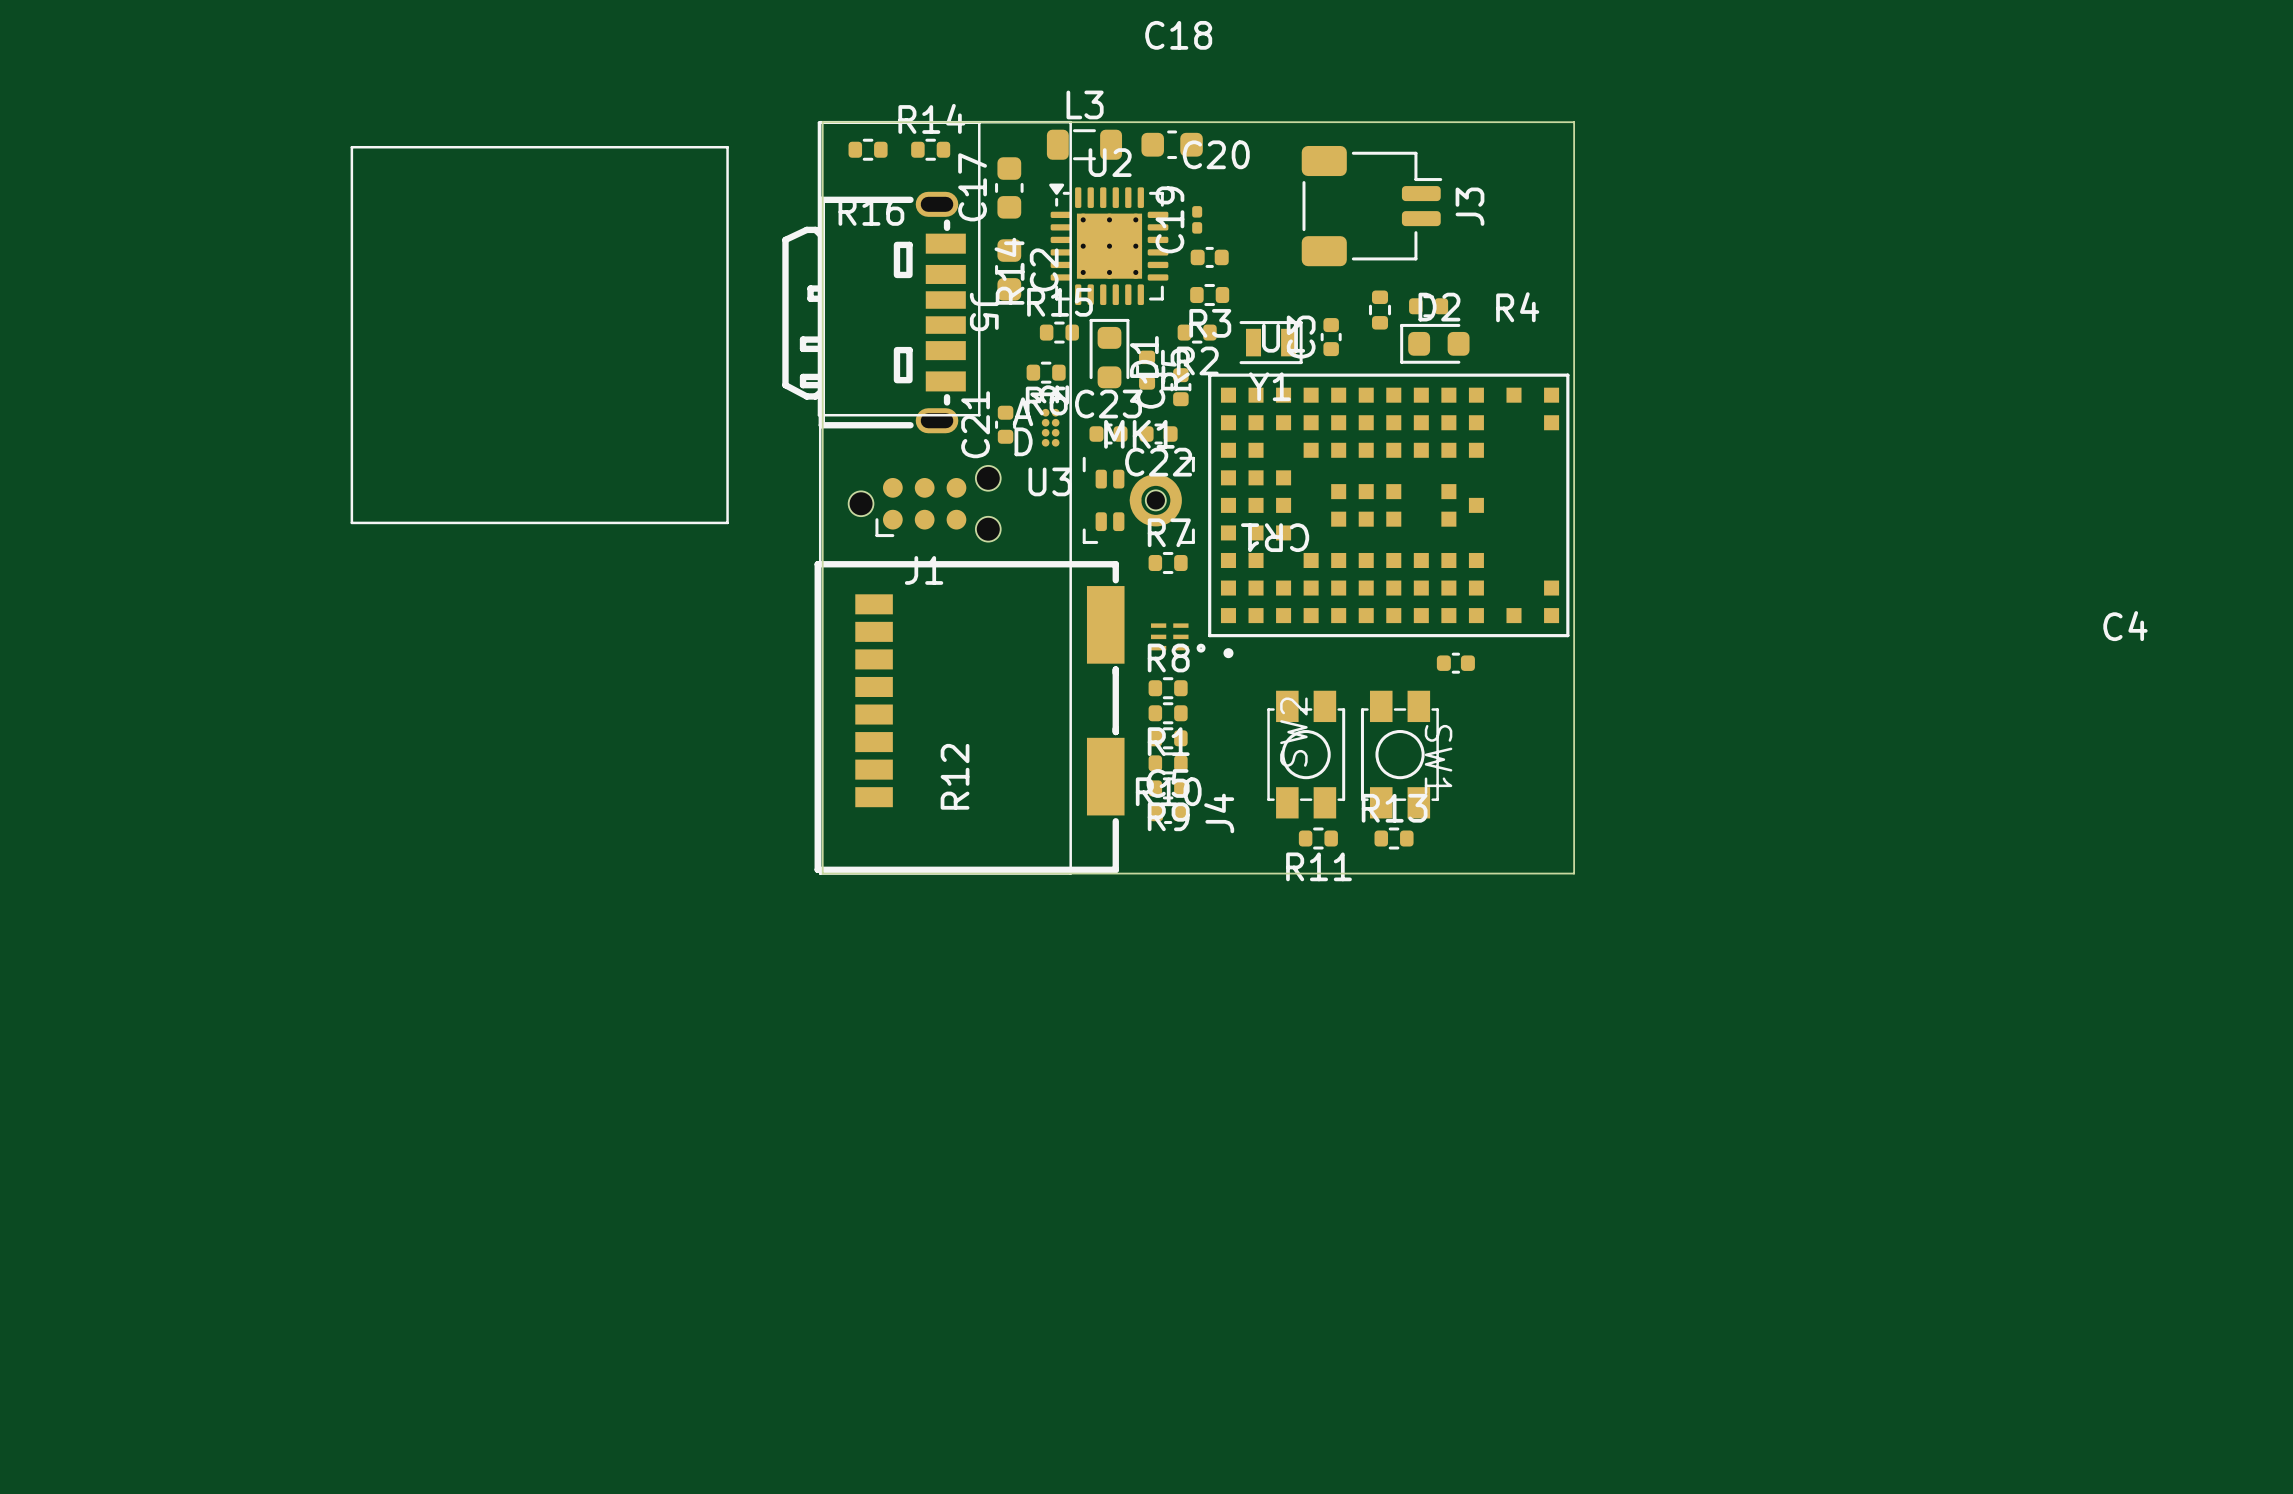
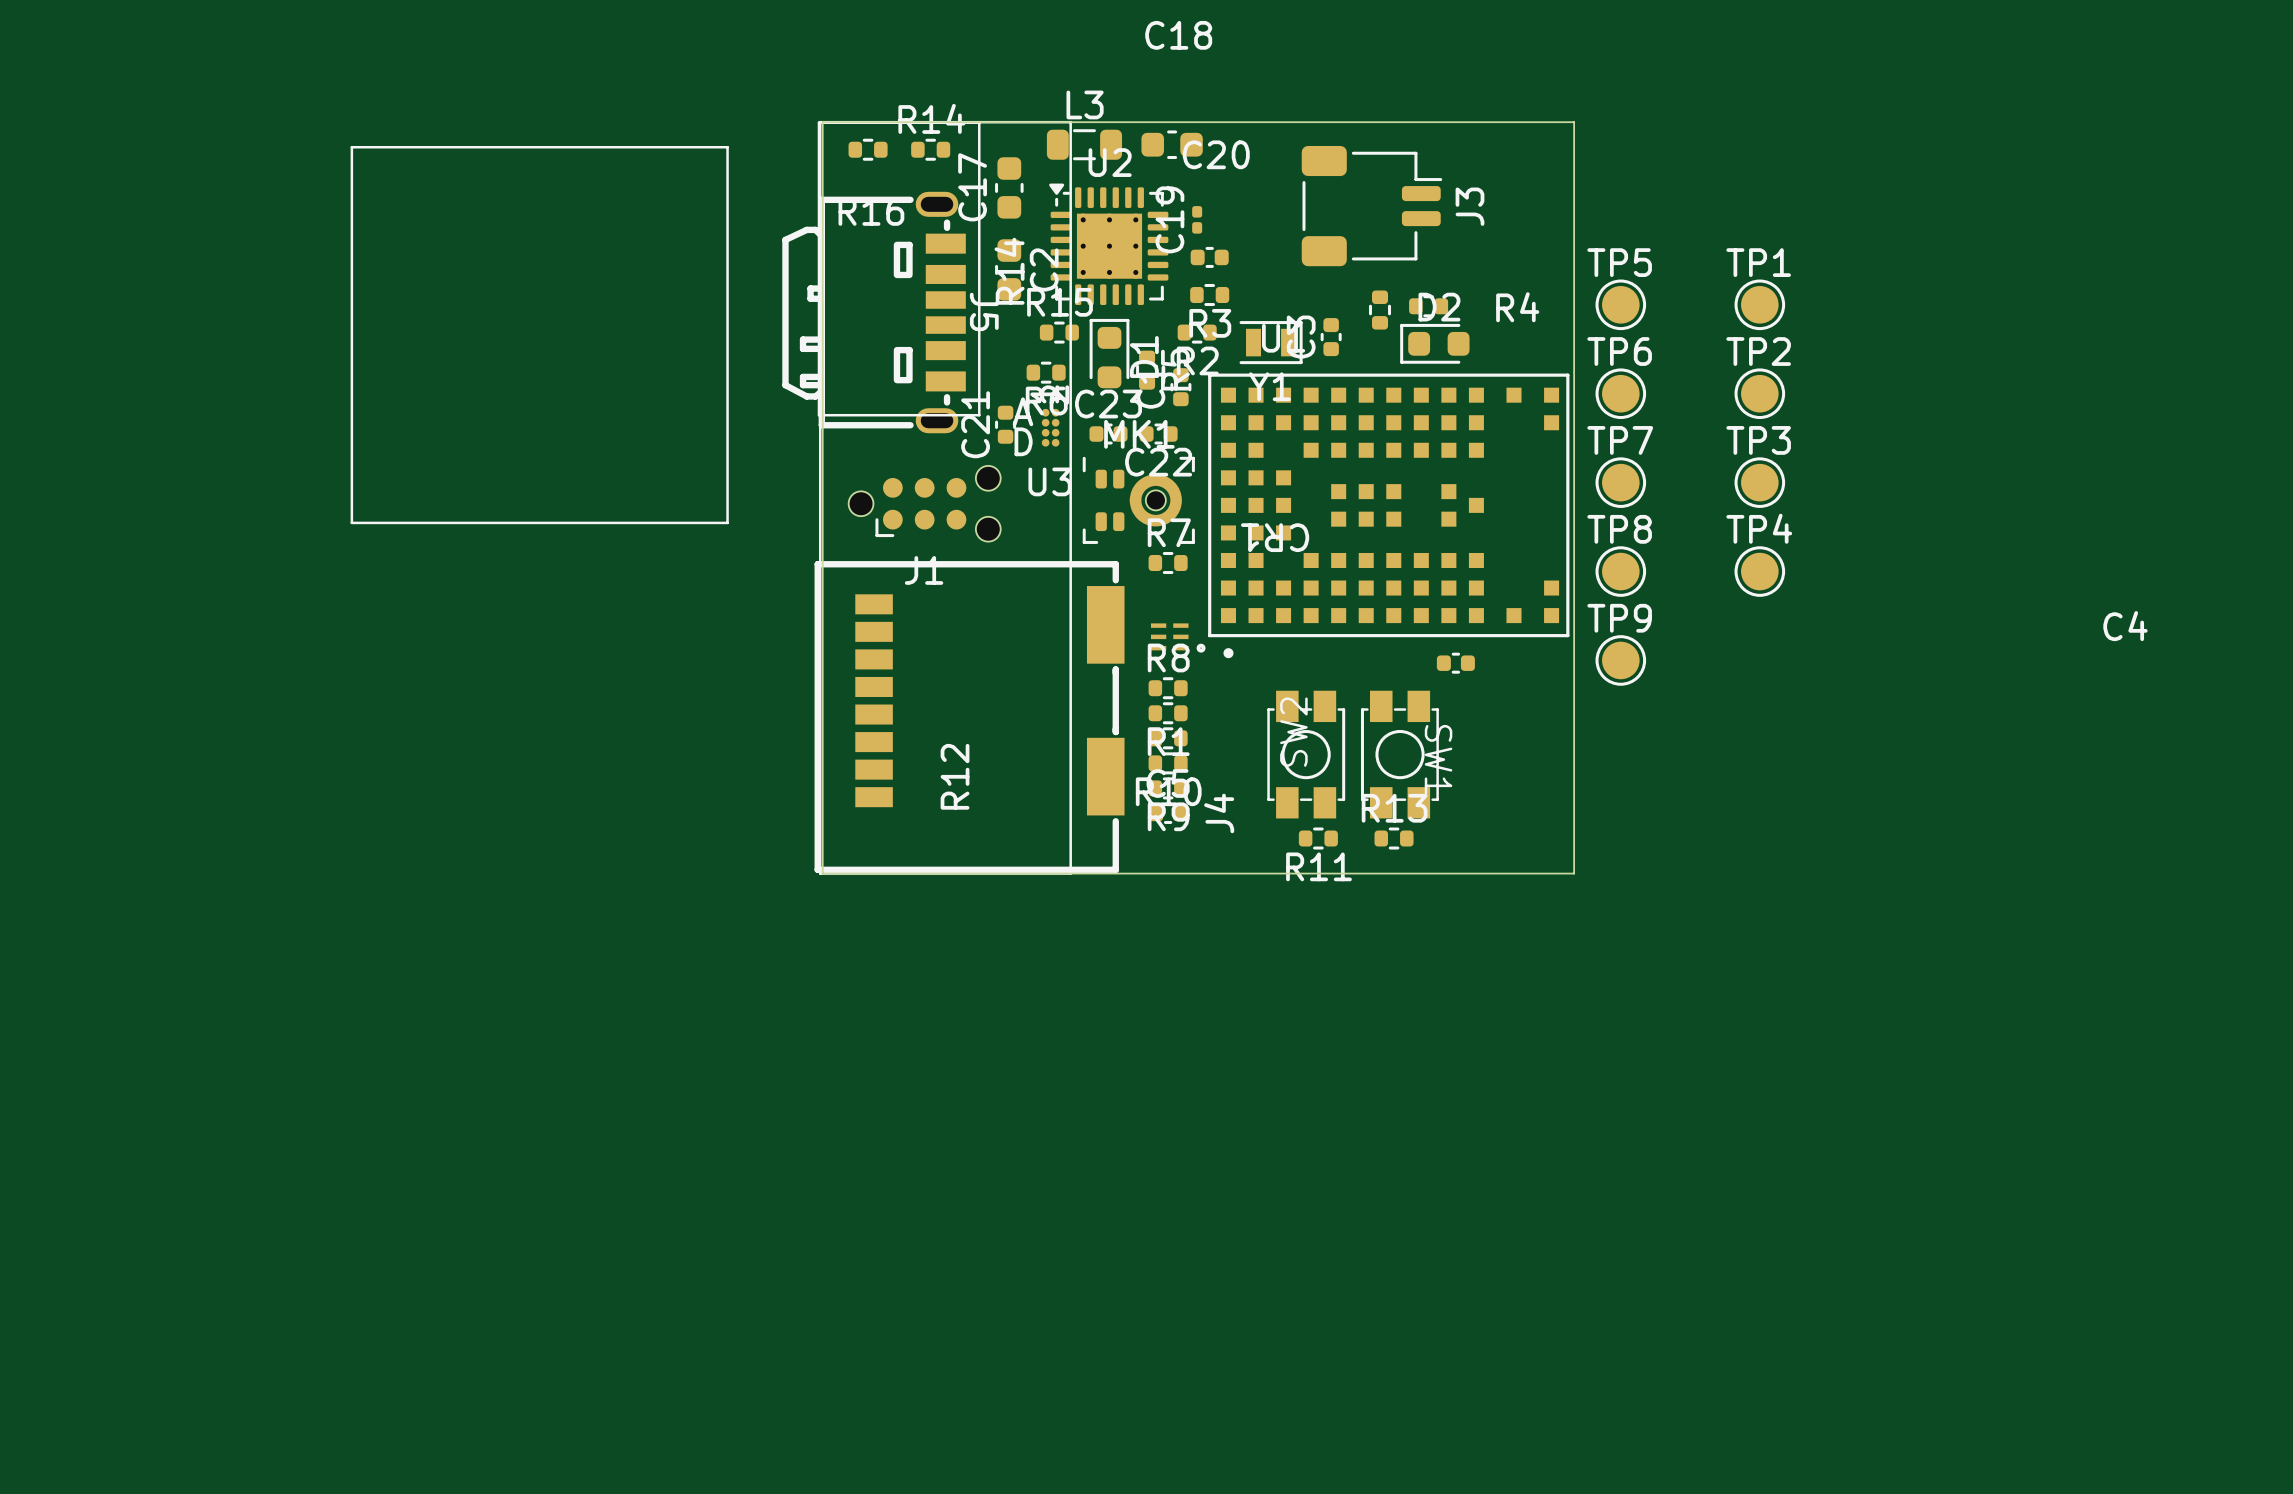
TP5: none -> (1620, 304)
TP1: none -> (1759, 304)
TP6: none -> (1620, 393)
TP2: none -> (1759, 393)
TP7: none -> (1620, 482)
TP3: none -> (1759, 482)
TP8: none -> (1620, 571)
TP4: none -> (1759, 571)
TP9: none -> (1620, 660)

